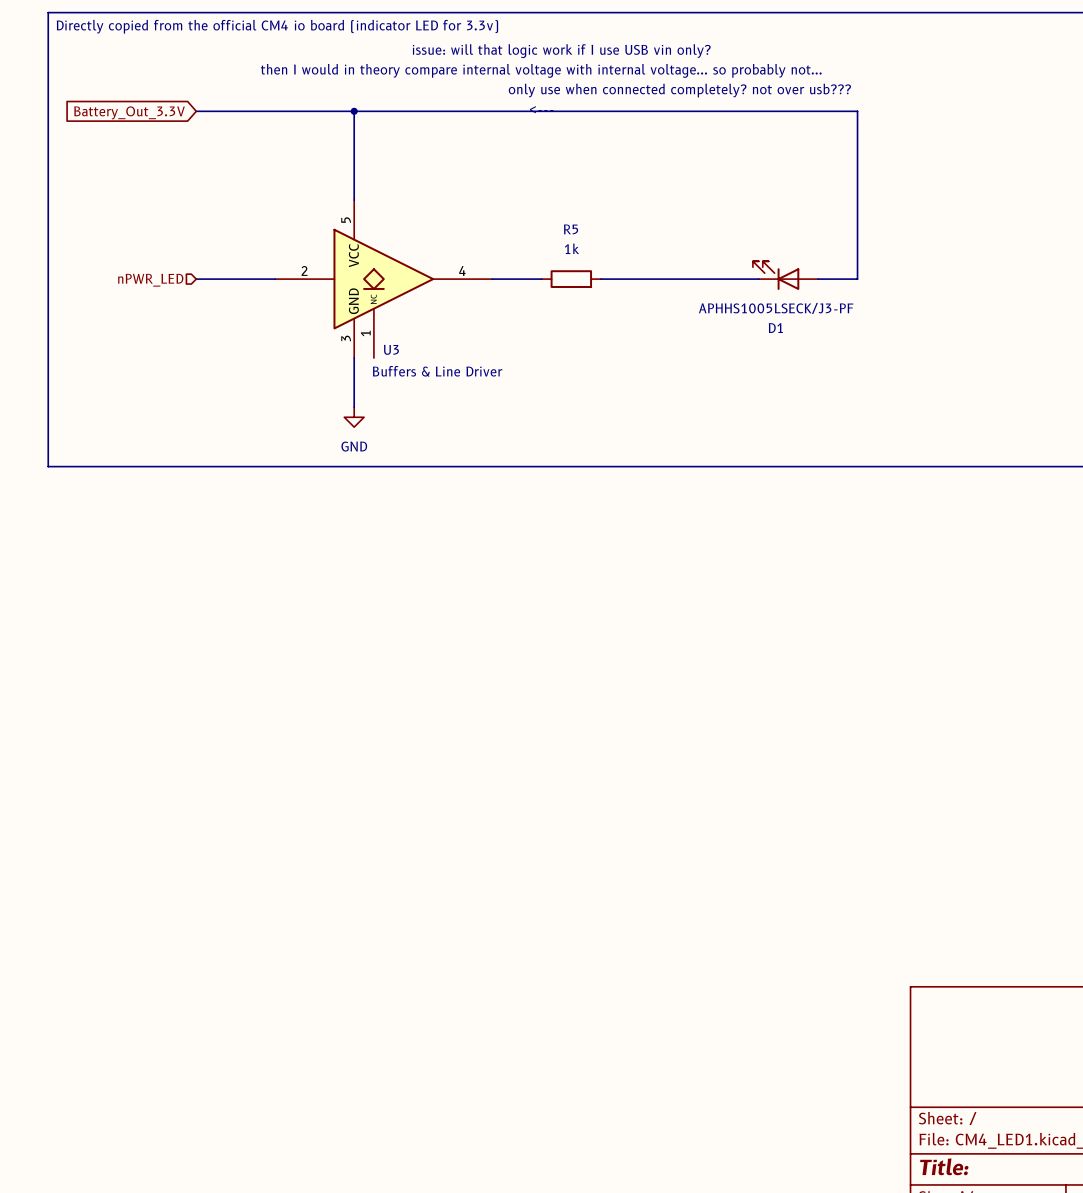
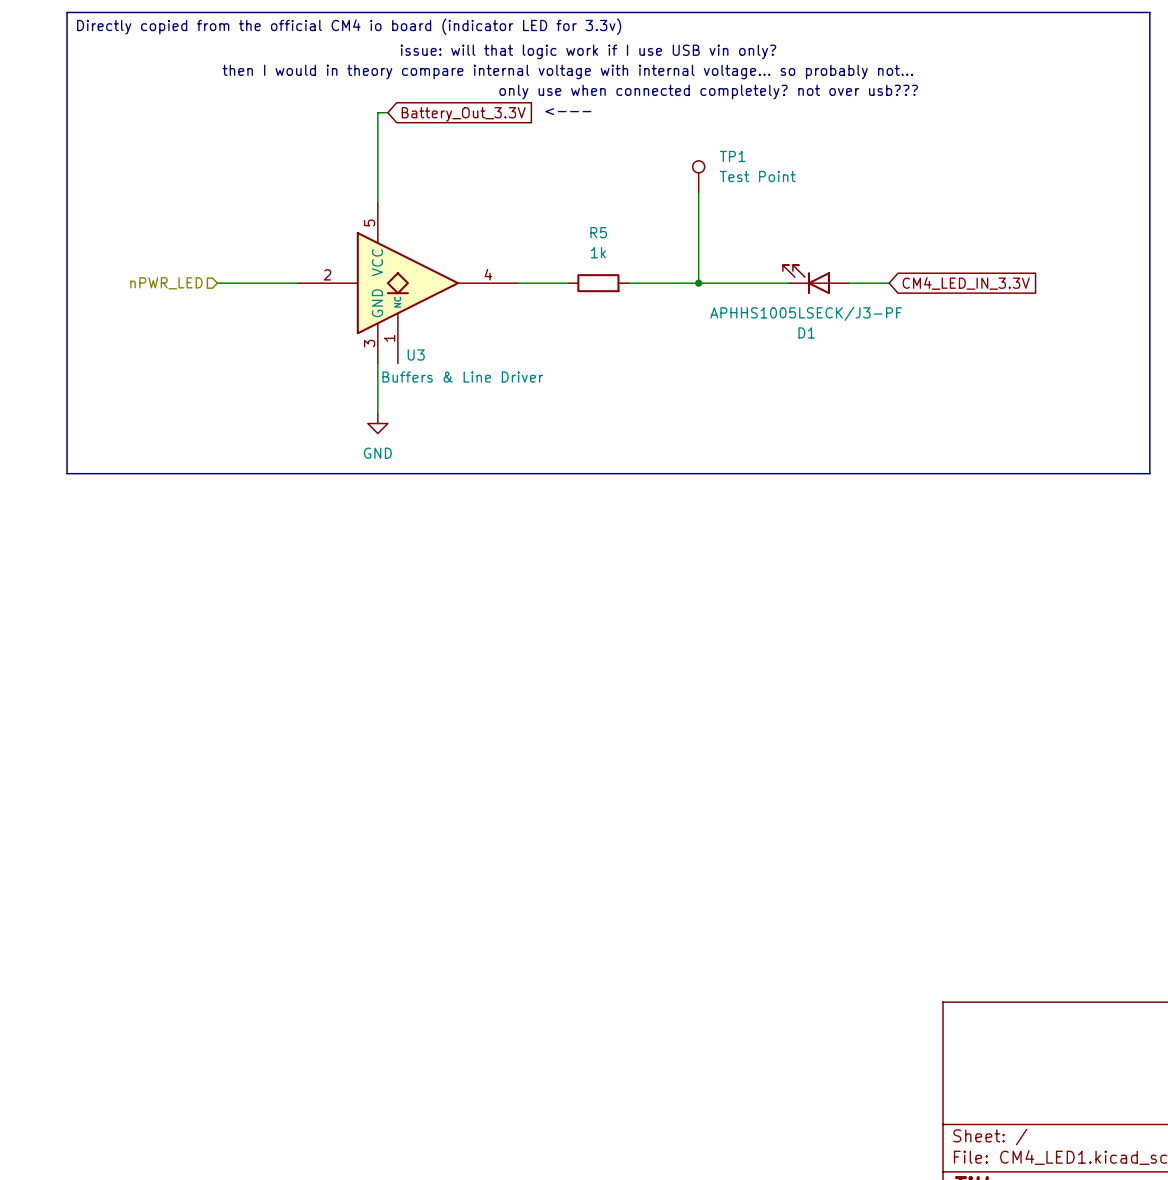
wire: (196, 111) (354, 111) -> none
junction: (354, 111) -> none
wire: (364, 111) (857, 111) (857, 279) -> none
global label rotation: 0° (129, 112) -> 180° (463, 114)
global label position: Battery_Out_3.3V (129, 112) -> Battery_Out_3.3V (463, 114)
TP1: none -> Test Point (698, 176)
wire: none -> (698, 192) (698, 283)
junction: none -> (698, 283)
global label: none -> CM4_LED_IN_3.3V (966, 283)

